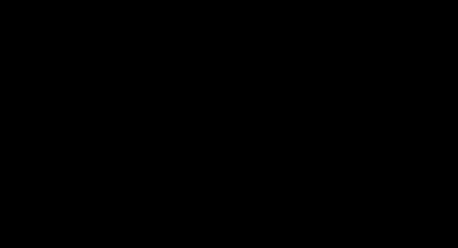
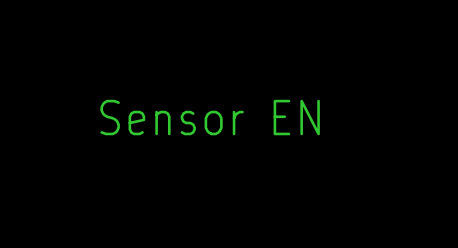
text: none -> Sensor EN (210, 117)

